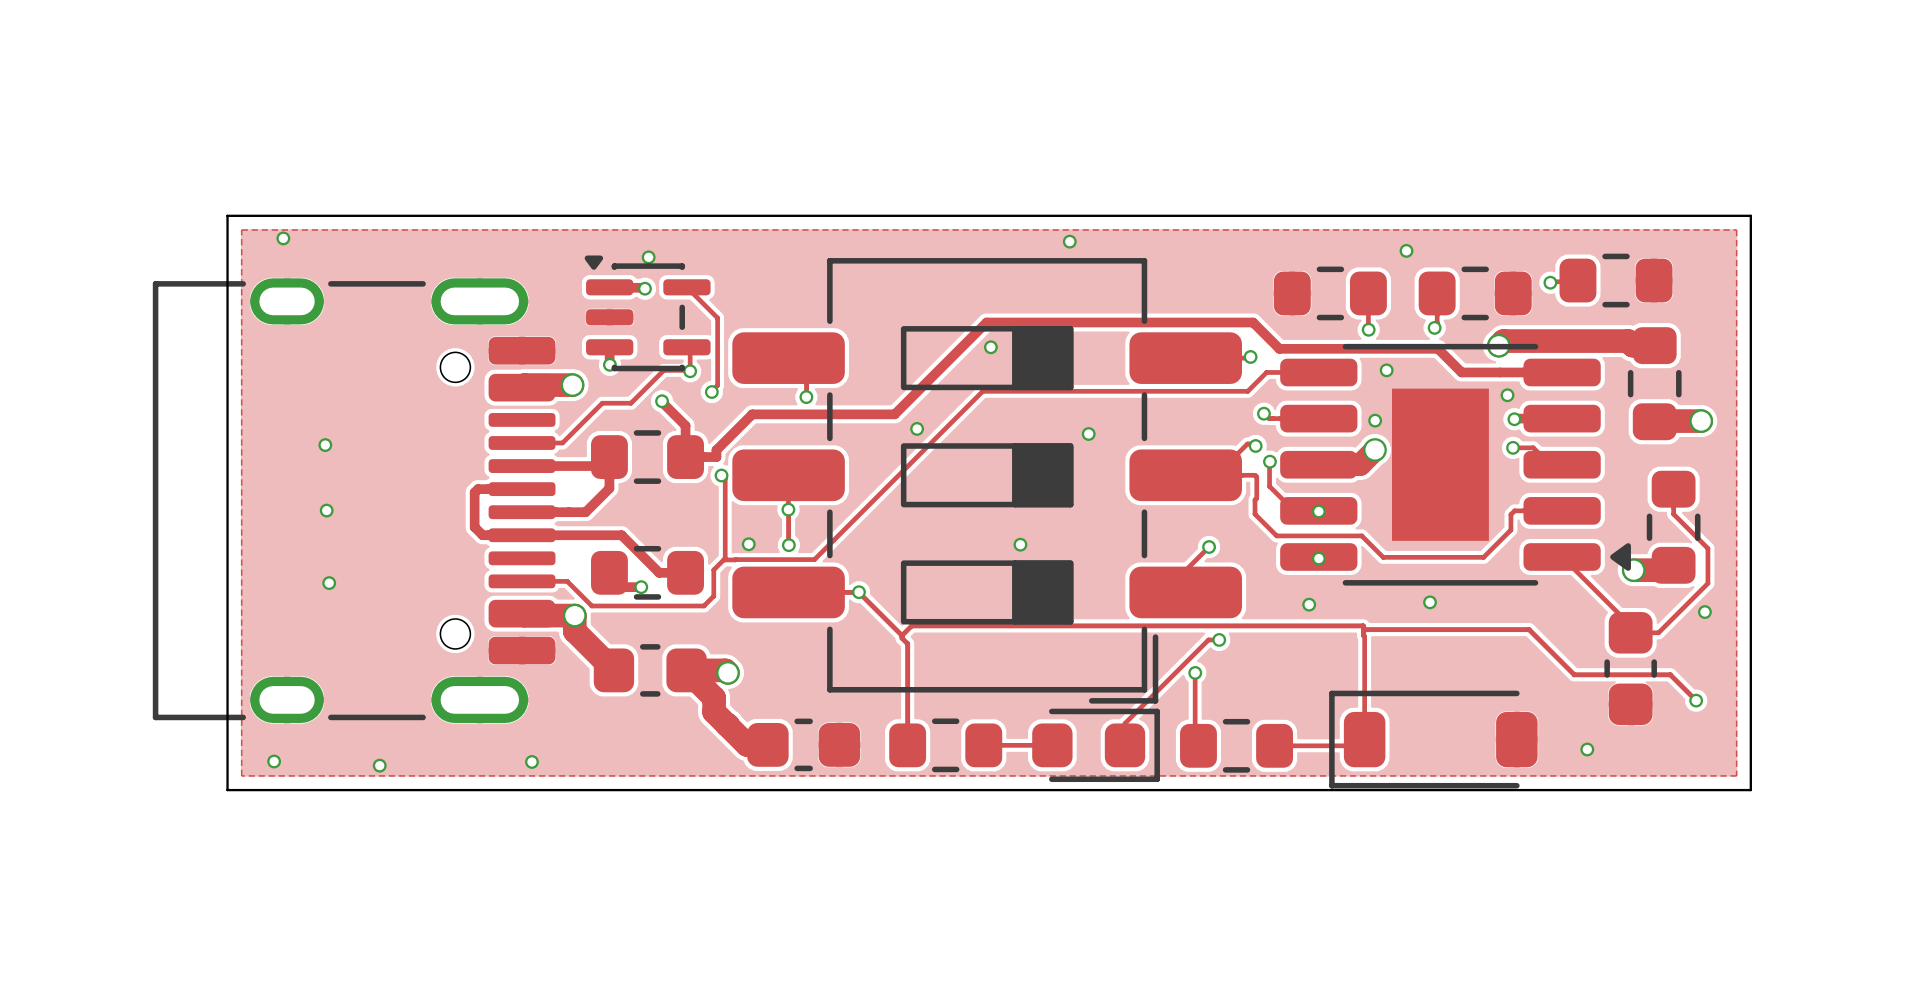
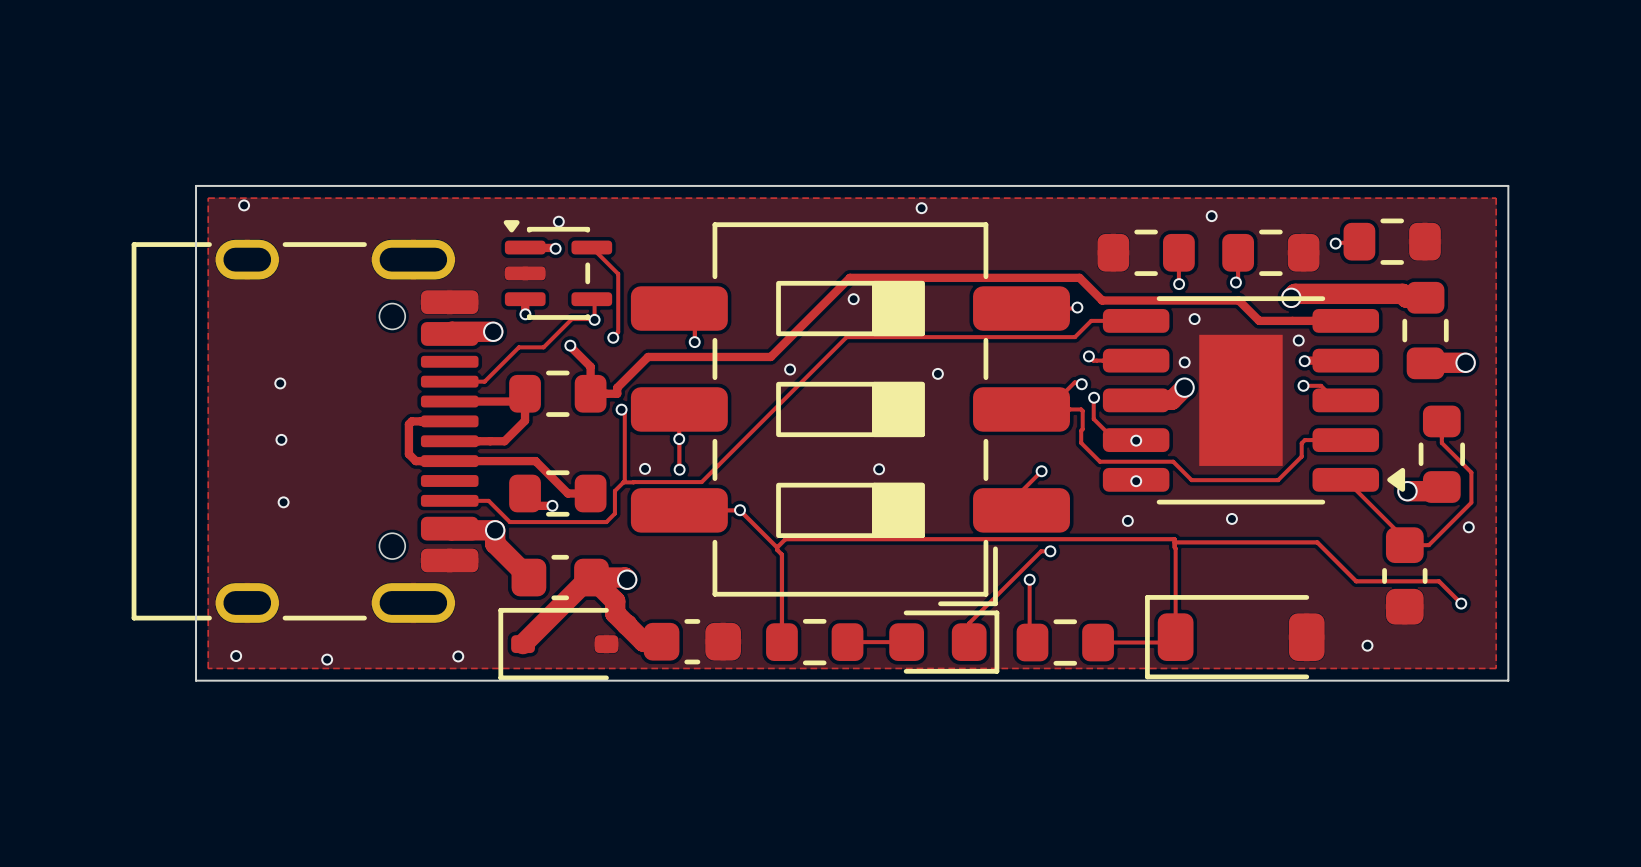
track: none -> (589, 577) (523, 644)
part: none -> (558, 644)

